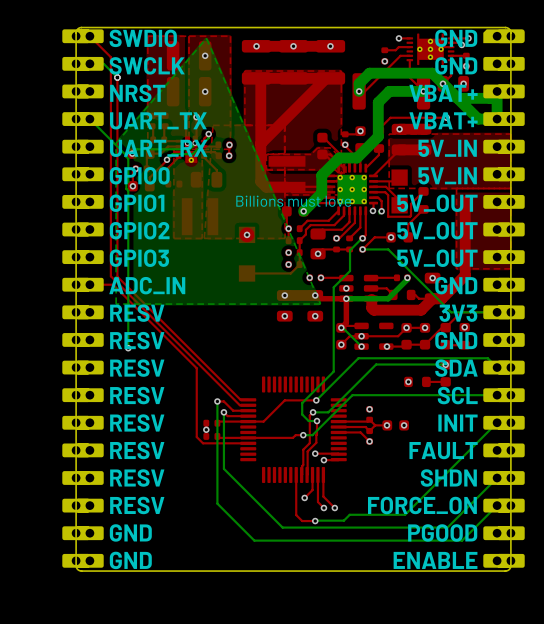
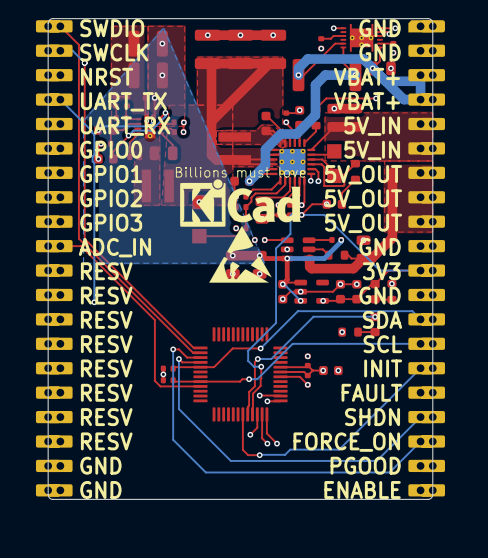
drawing: none -> [180, 179, 301, 283]

